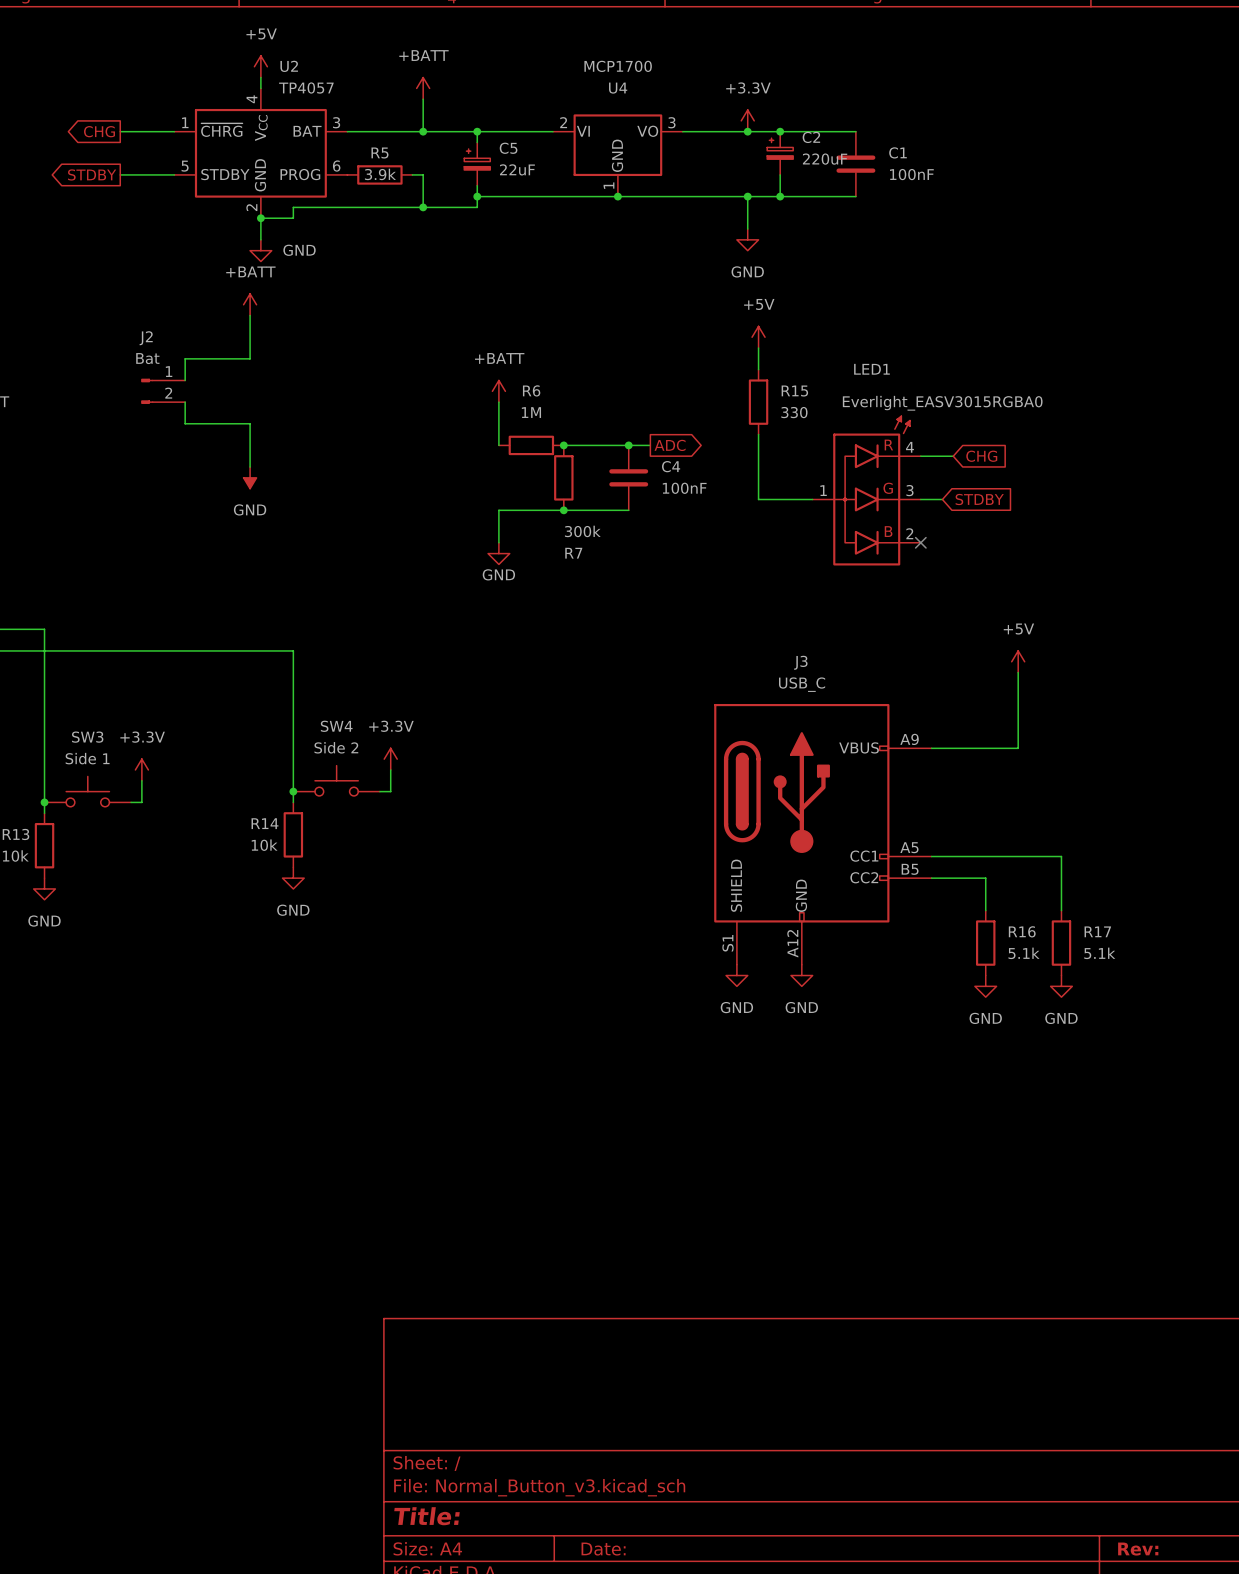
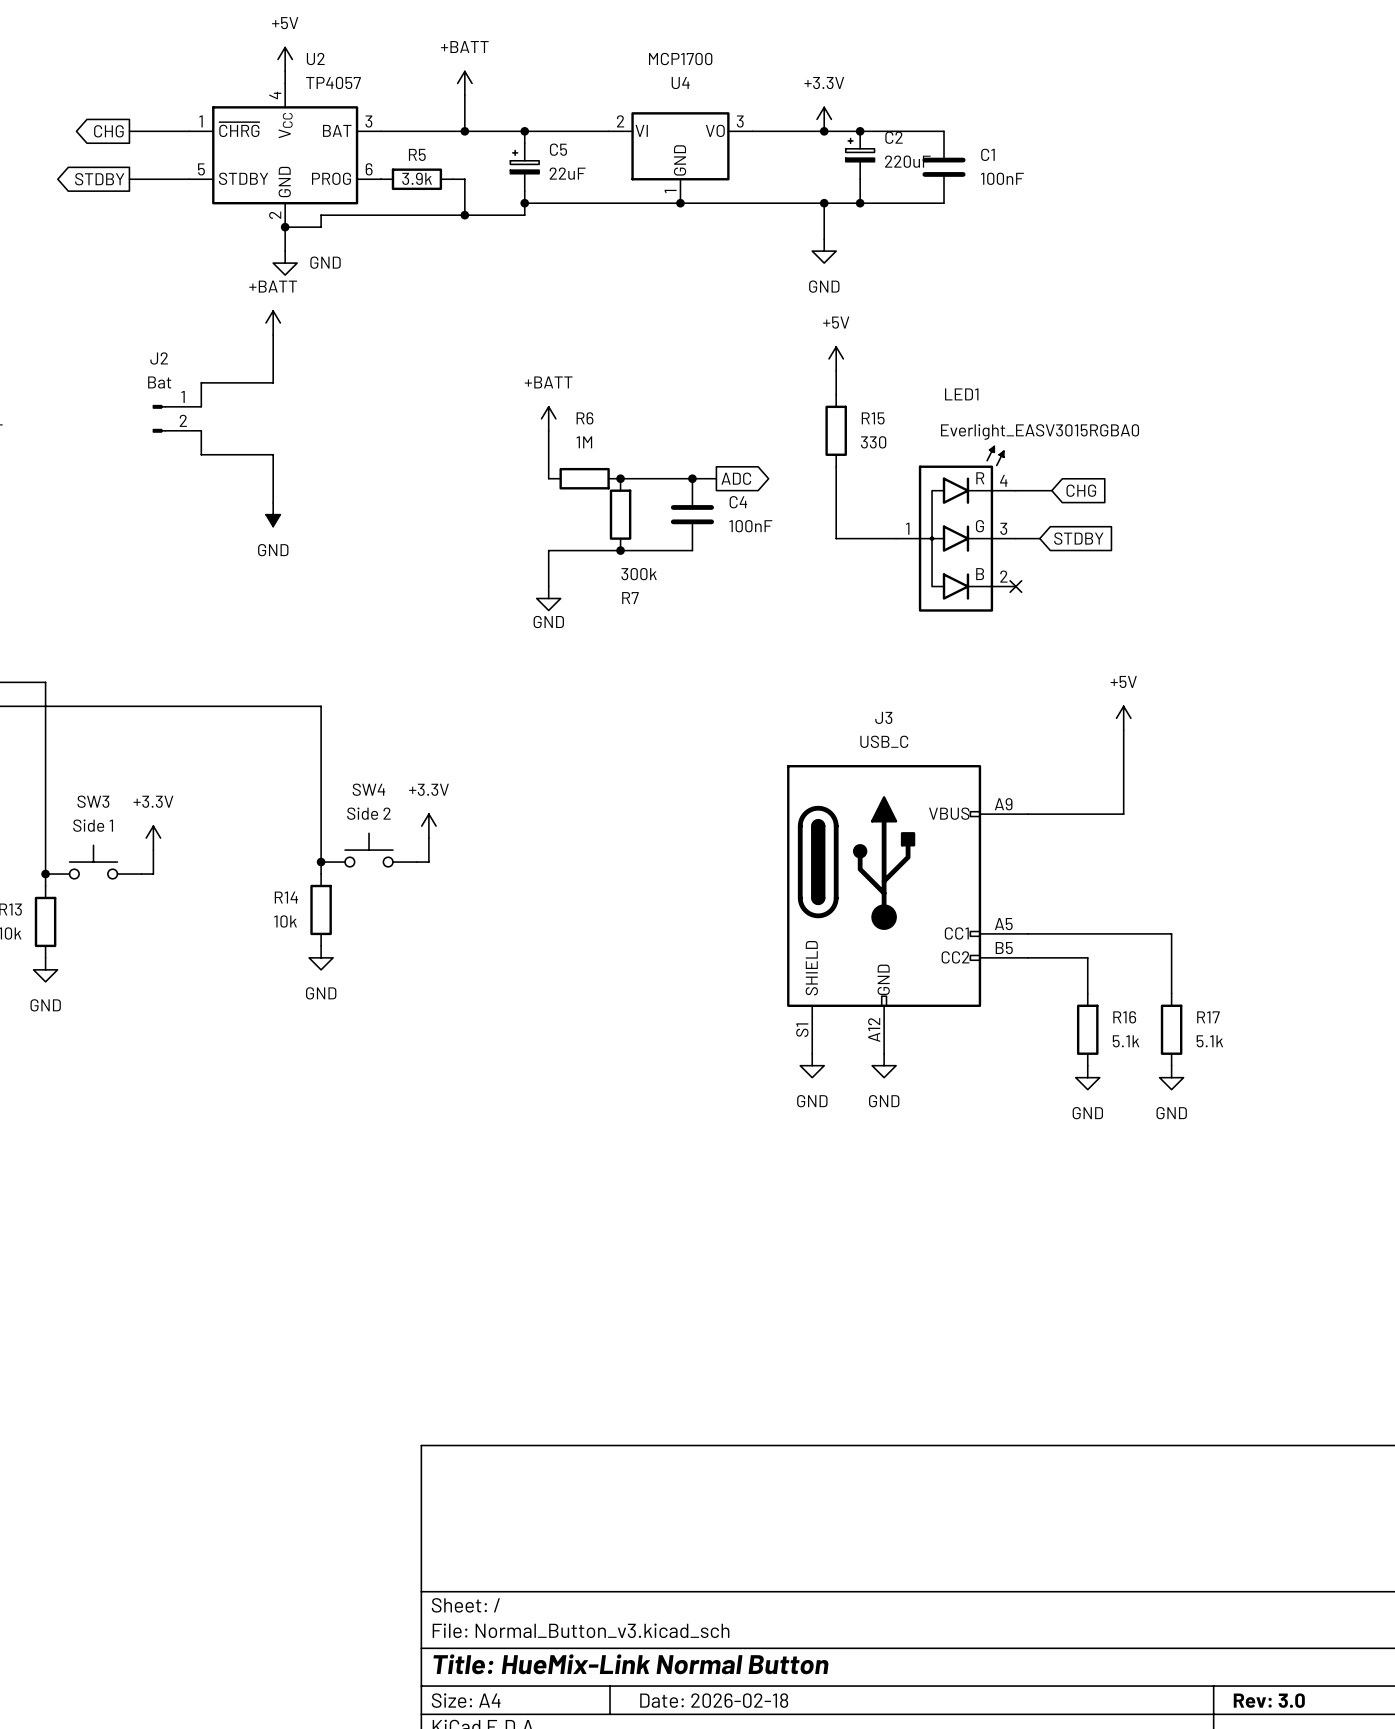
title block: Title: (426, 1516) -> Title: HueMix-Link Normal Button (631, 1664)
title block: Date: (603, 1549) -> Date: 2026-02-18 (714, 1700)
title block: Rev: (1138, 1549) -> Rev: 3.0 (1269, 1700)

